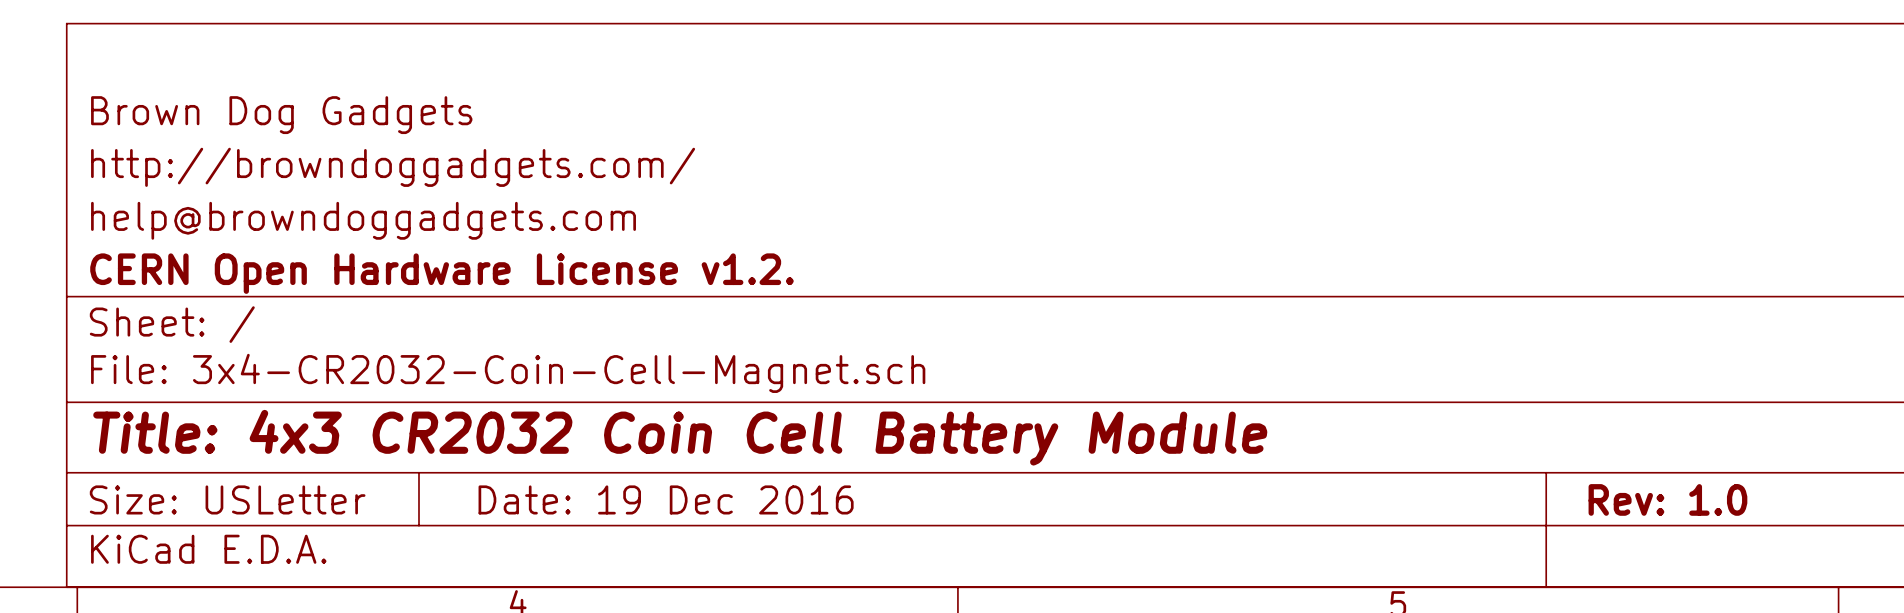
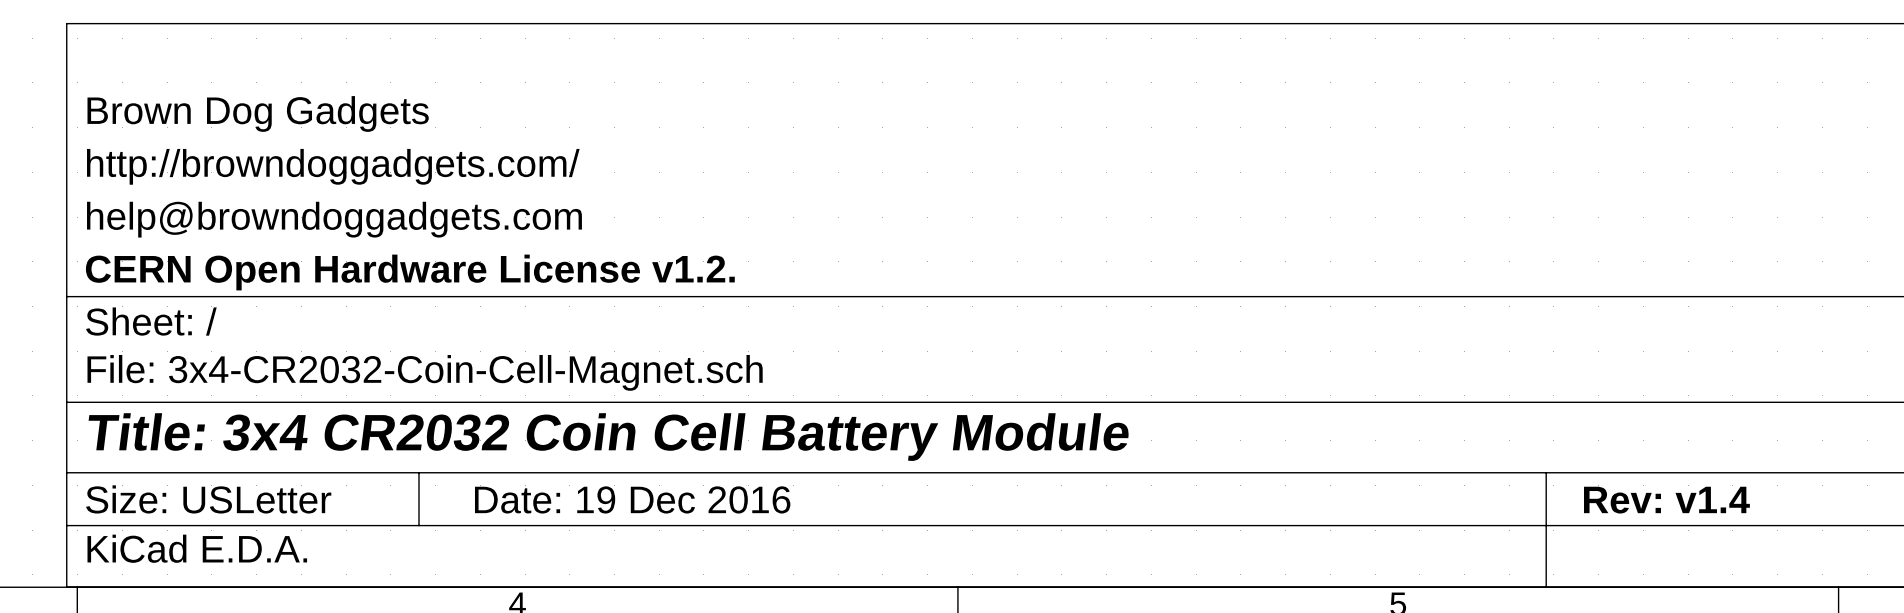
title block: Title: 4x3 CR2032 Coin Cell Battery Module (680, 437) -> Title: 3x4 CR2032 Coin Cell Battery Module (608, 437)
title block: Rev: 1.0 (1667, 499) -> Rev: v1.4 (1666, 500)

